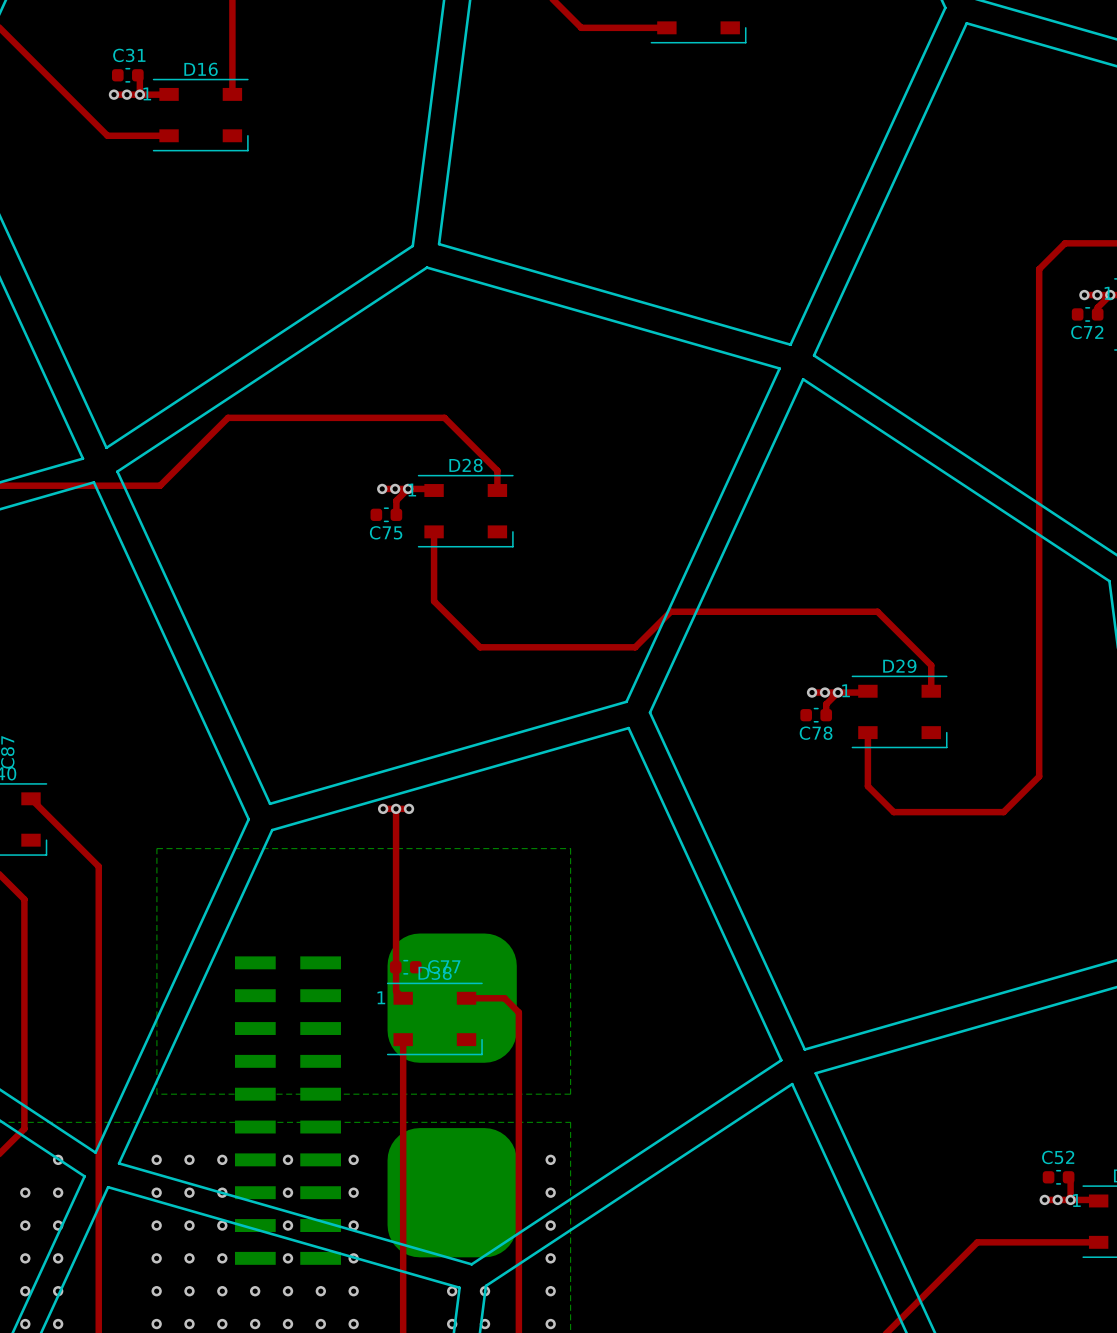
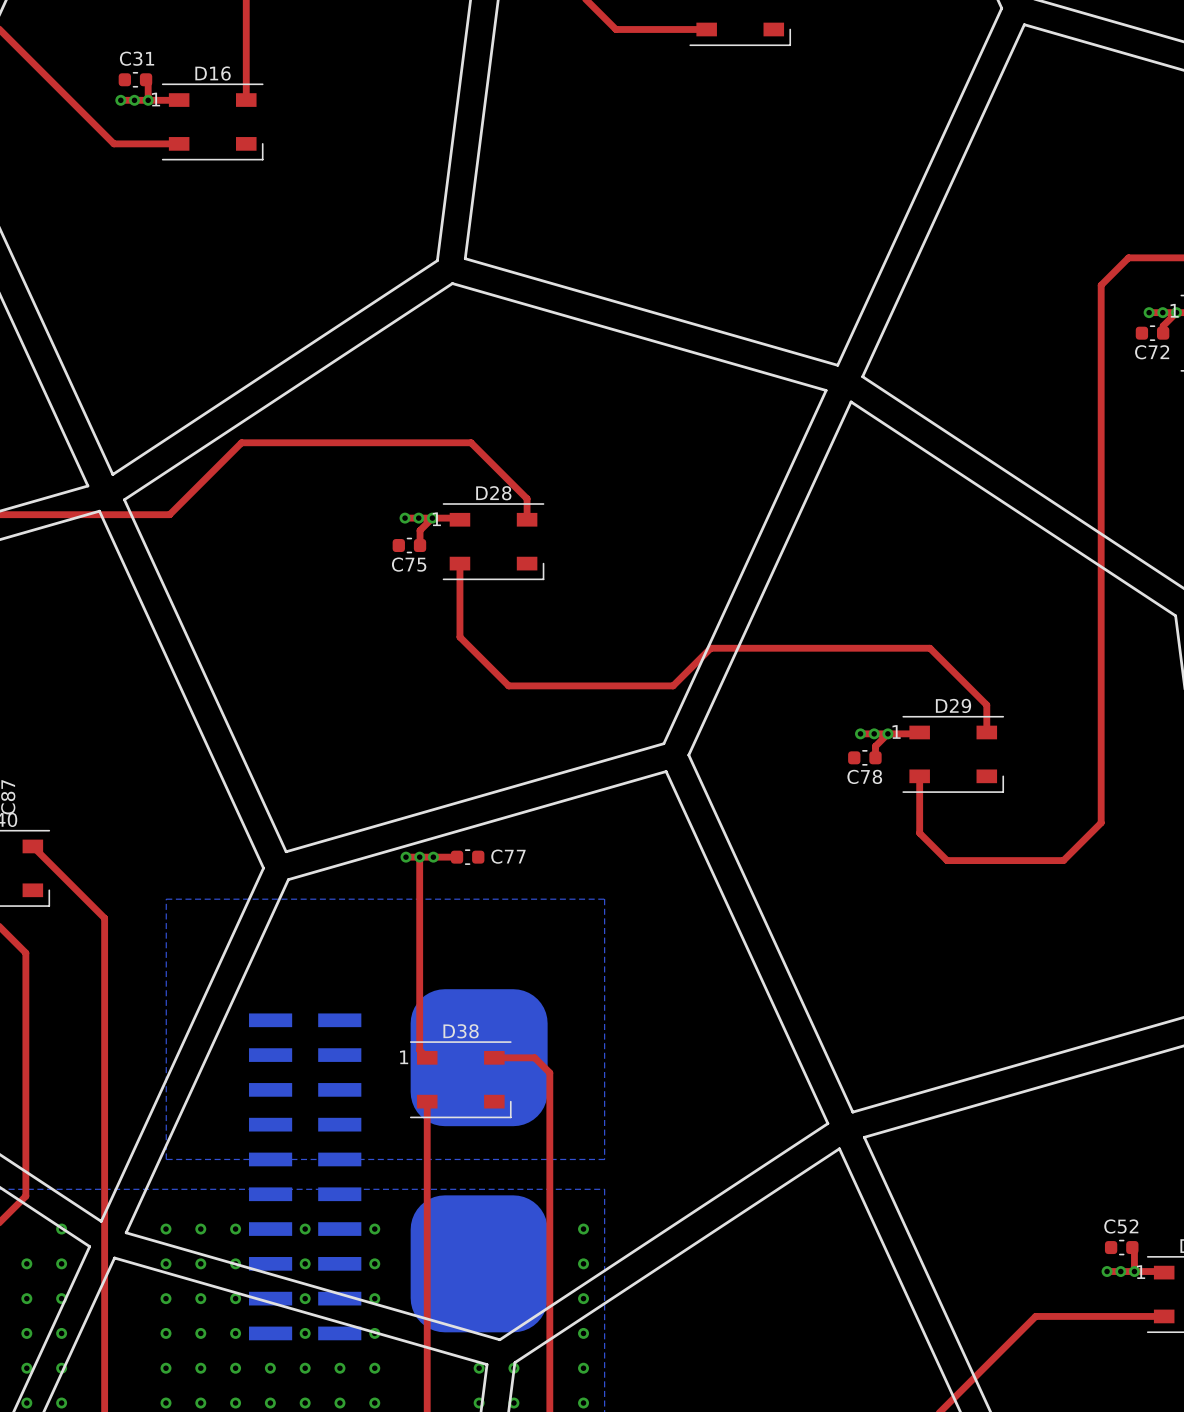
top track: none -> (433, 857) (457, 857)
C77 position: (405, 967) -> (467, 857)

